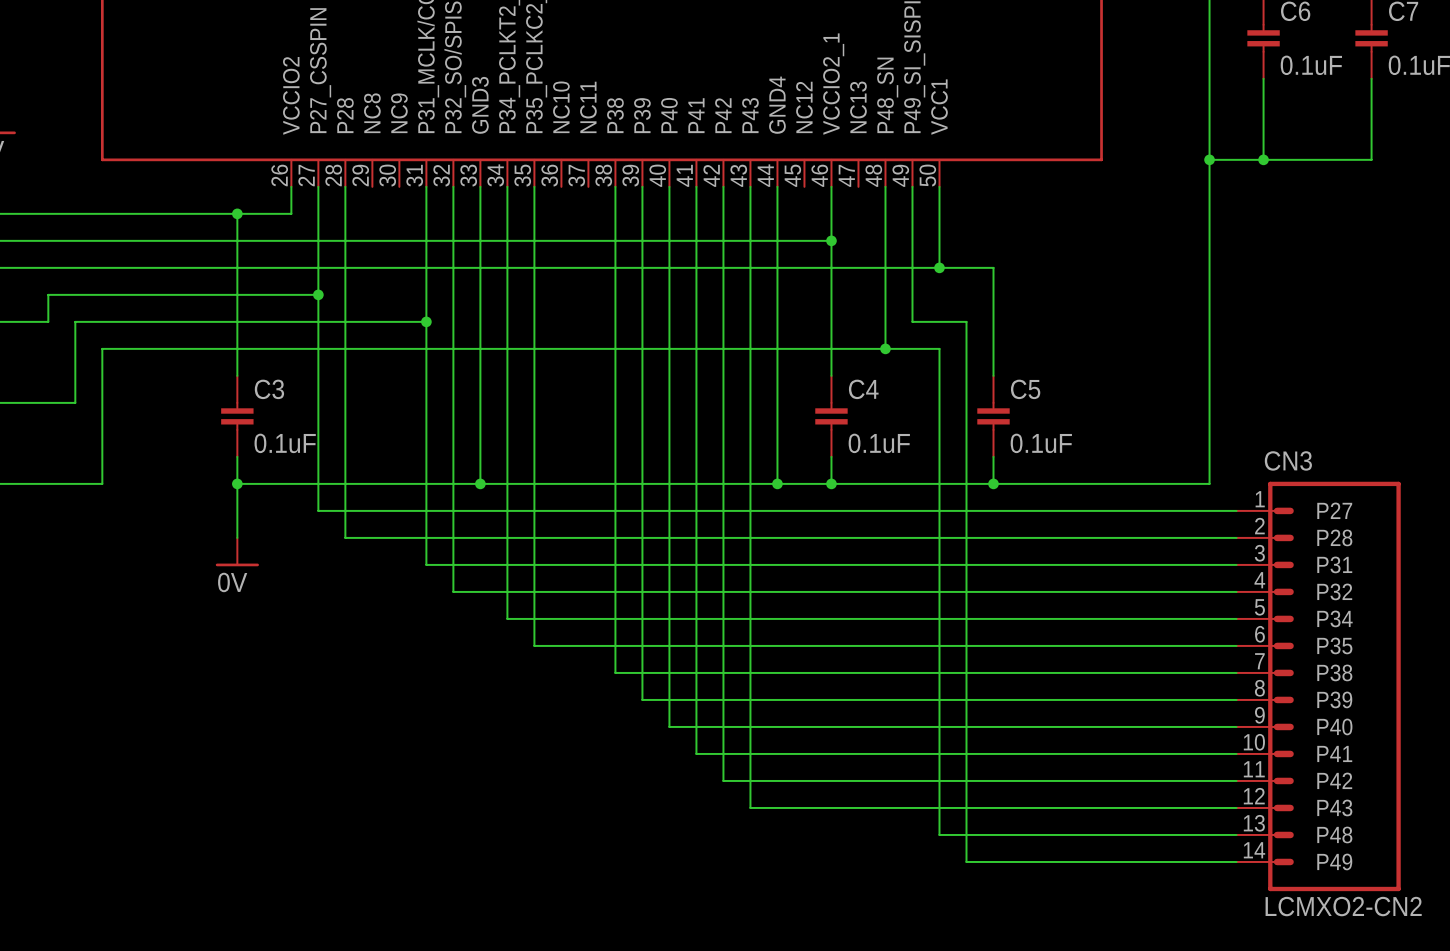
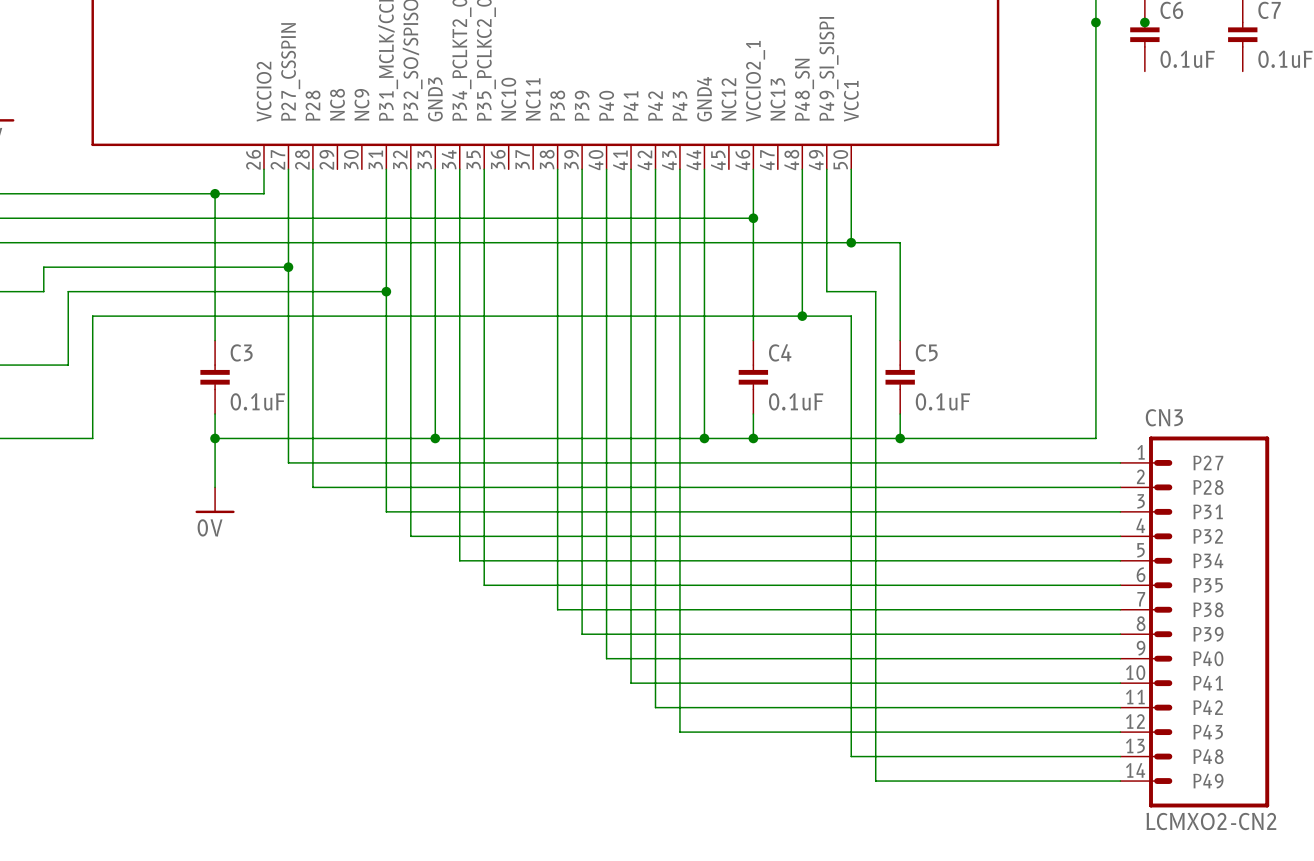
junction: none -> (1095, 22)
junction: none -> (1144, 22)
wire: (1263, 78) (1263, 159) -> none
wire: (1371, 78) (1371, 159) (1209, 159) -> none
junction: (1209, 159) -> none
junction: (1263, 159) -> none

